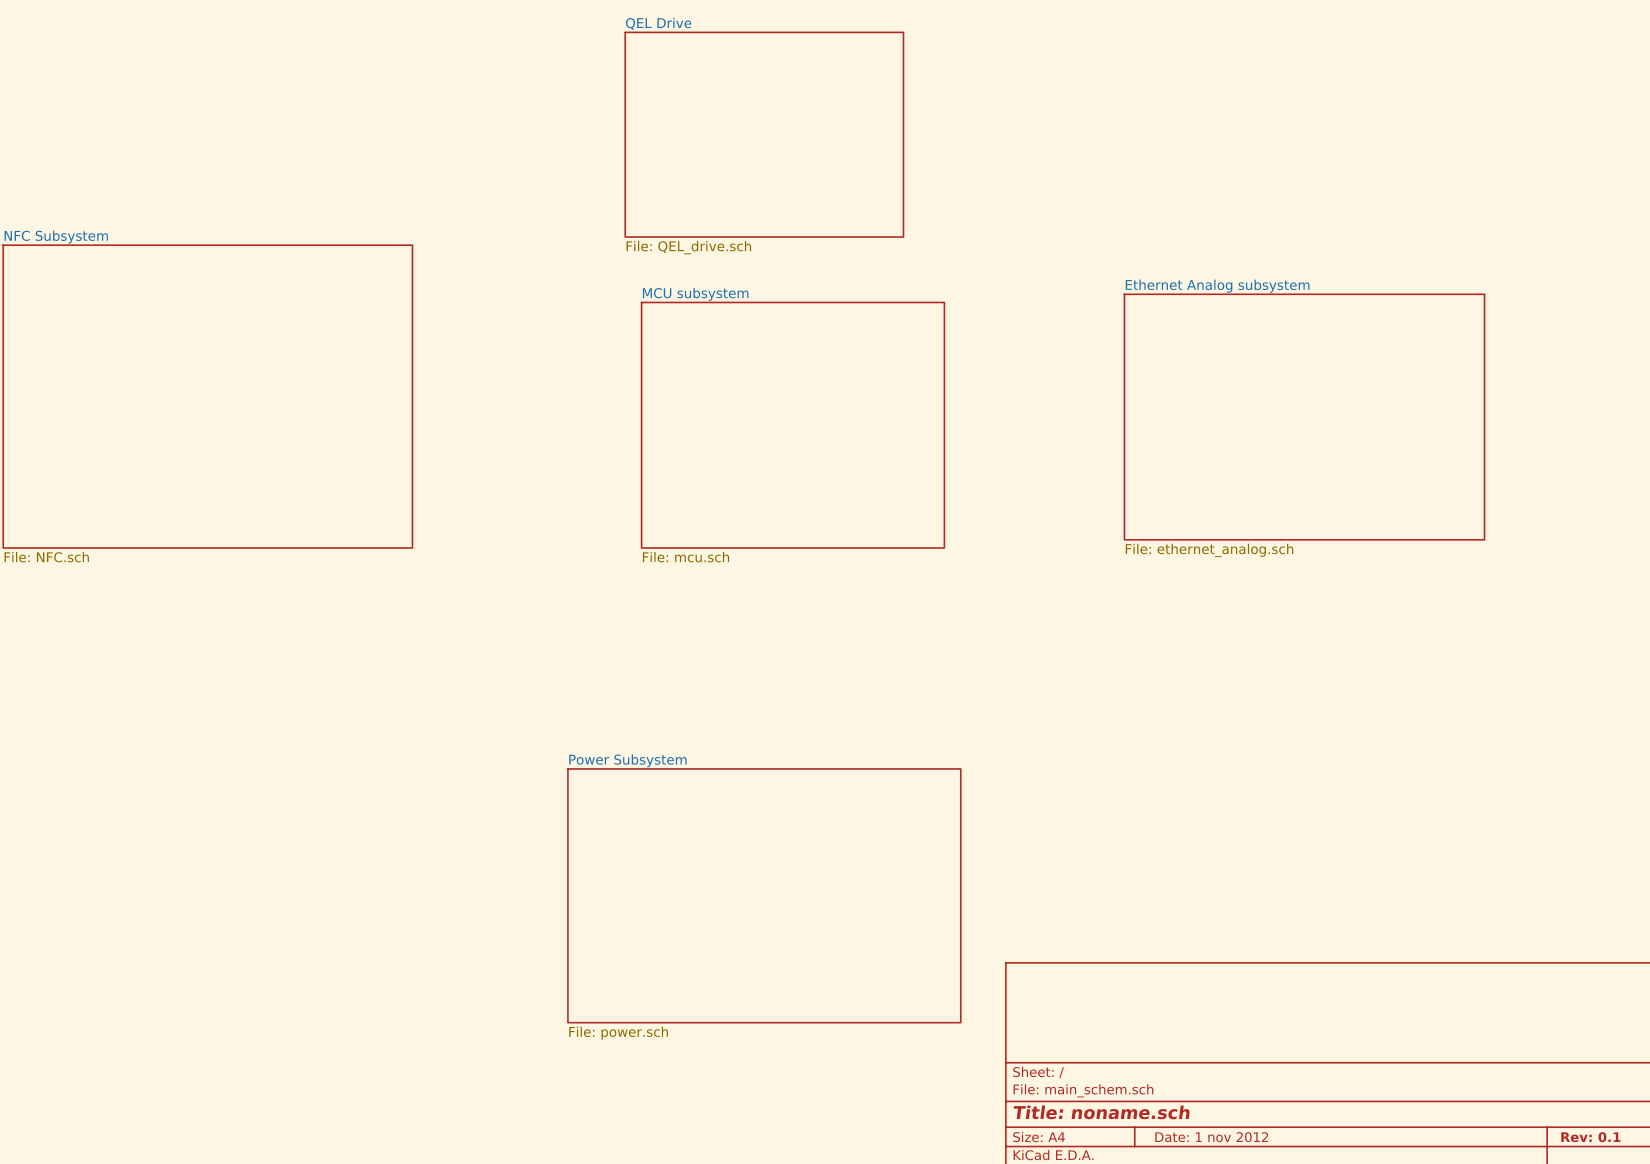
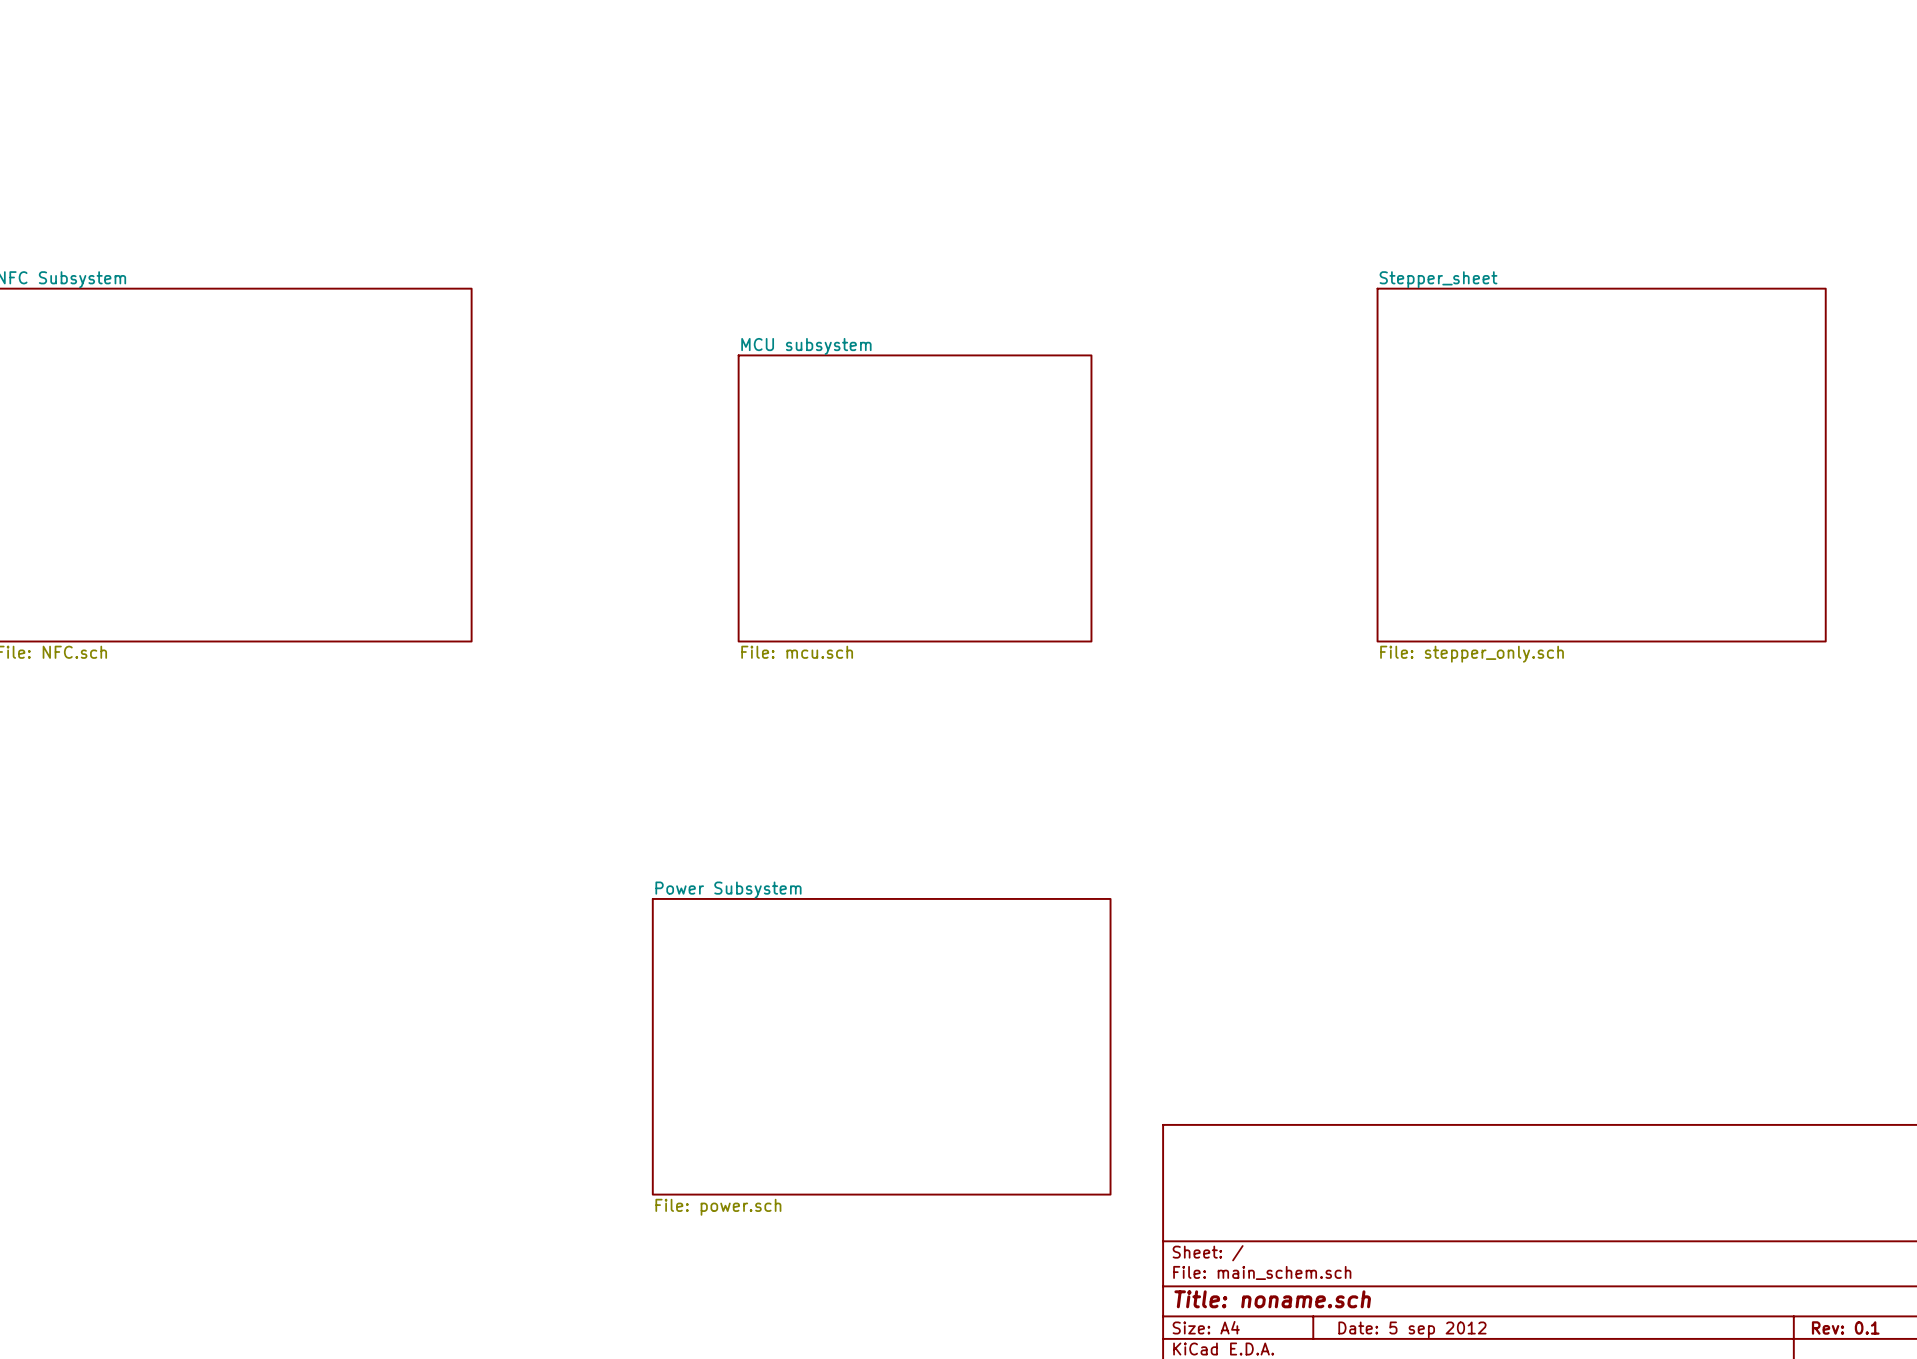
sheet QEL Drive: File: QEL_drive.sch (764, 134) -> none
sheet Stepper_sheet: none -> File: stepper_only.sch (1601, 465)
sheet Ethernet Analog subsystem: File: ethernet_analog.sch (1304, 417) -> none
title block: Date: 1 nov 2012 (1211, 1137) -> Date: 5 sep 2012 (1412, 1329)

